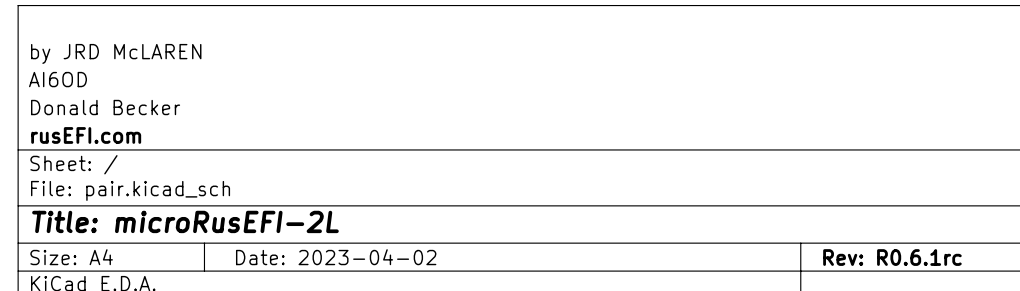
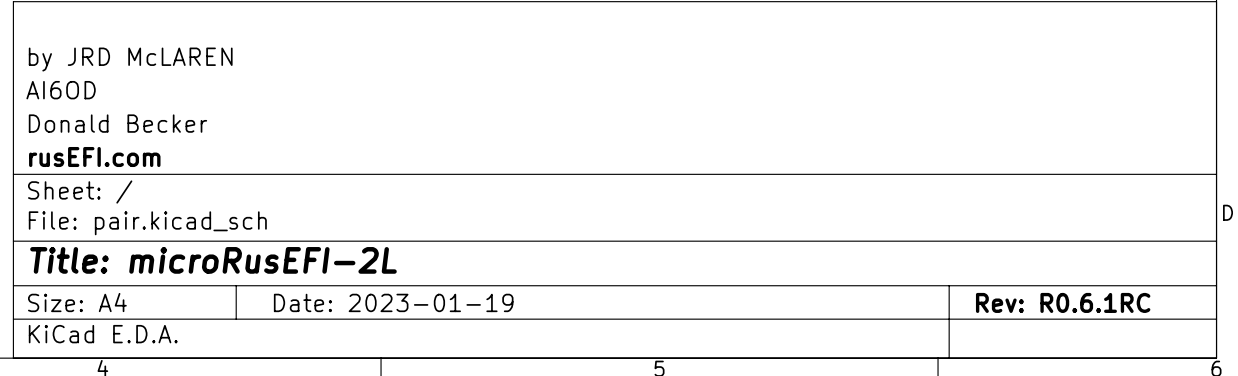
title block: Date: 2023-04-02 (336, 257) -> Date: 2023-01-19 (393, 302)
title block: Rev: R0.6.1rc (892, 257) -> Rev: R0.6.1RC (1063, 302)

